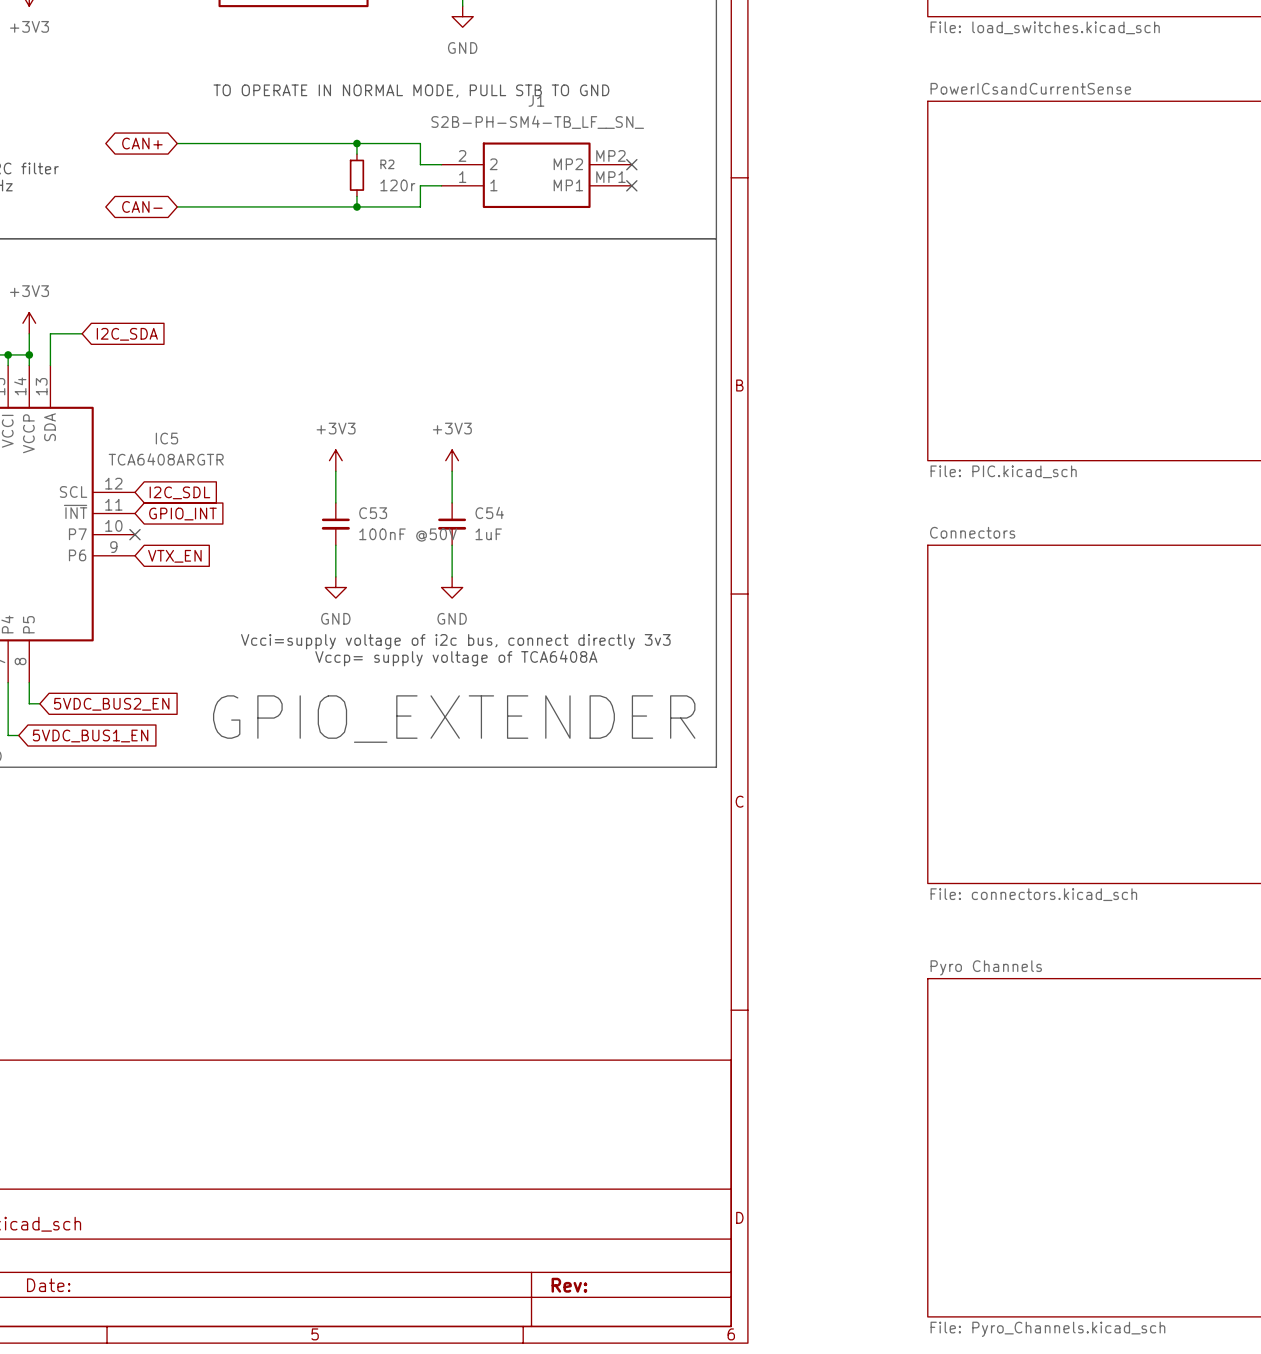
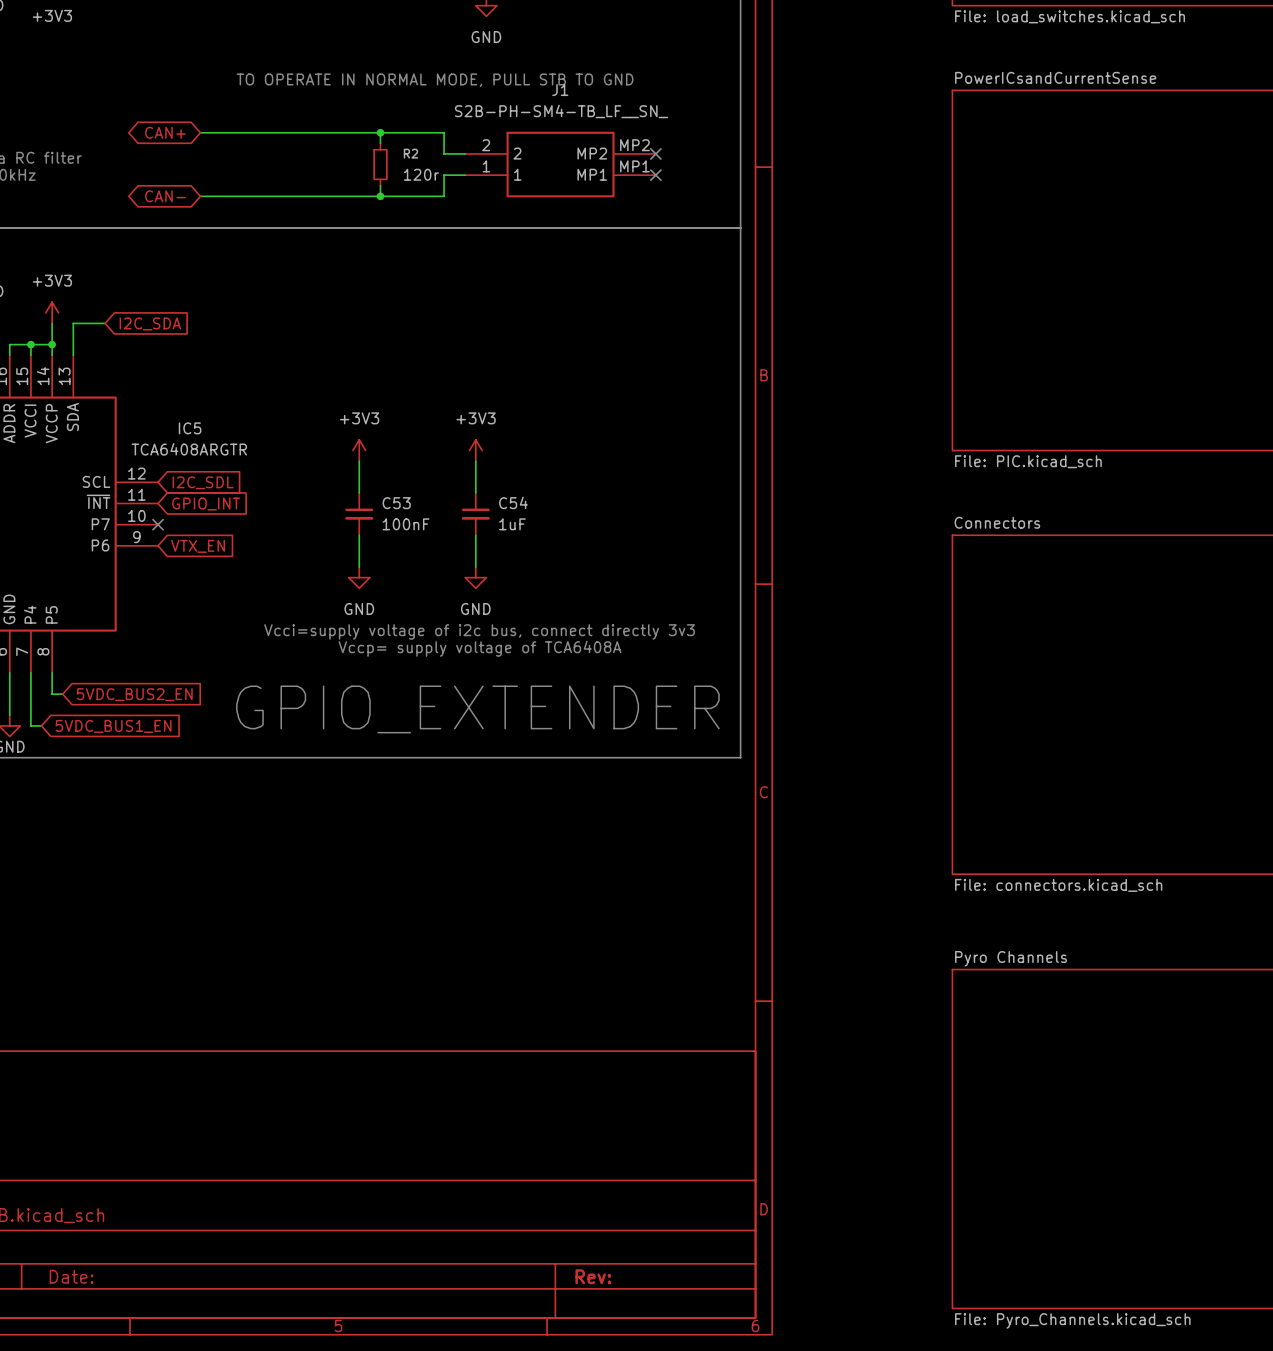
C53 value: 100nF @50V (408, 535) -> 100nF (406, 524)

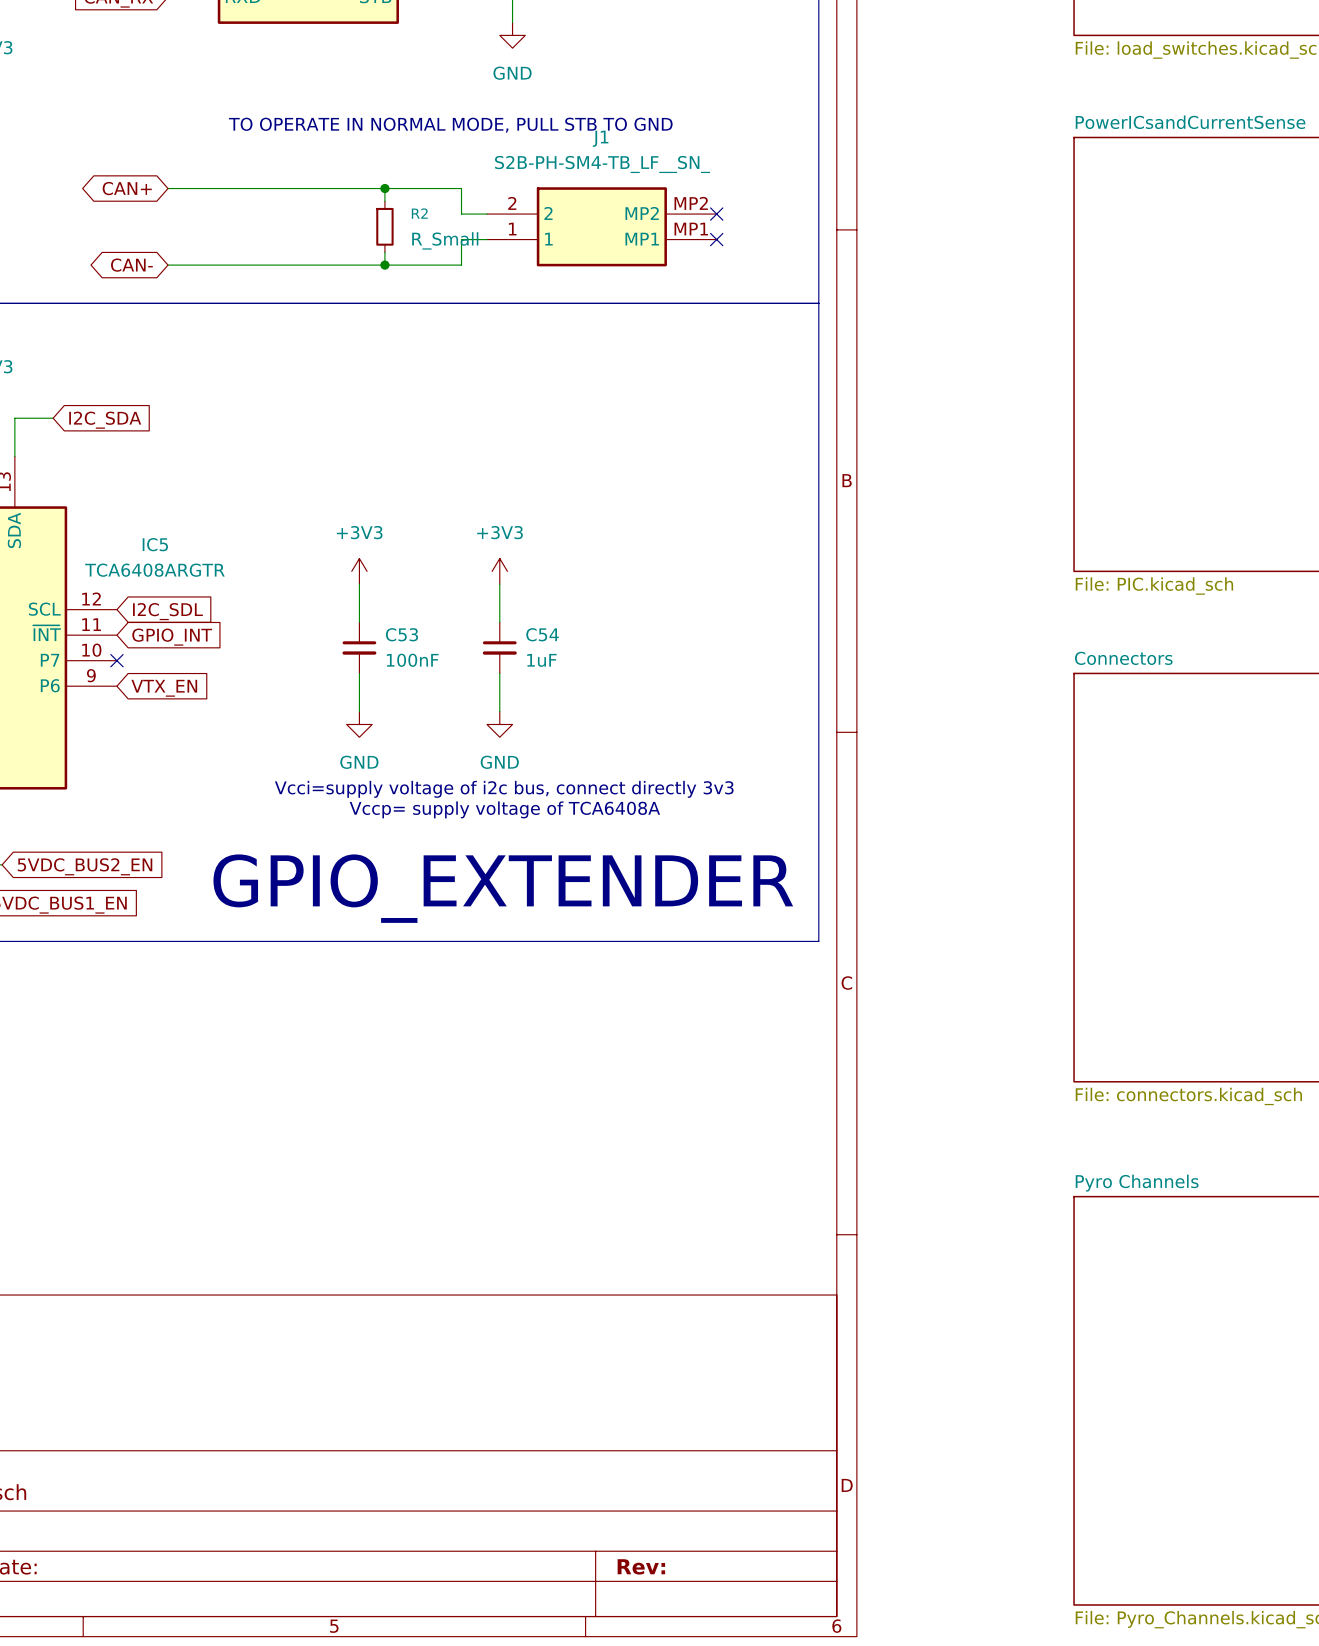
R2 value: 120r (421, 174) -> R_Small (445, 240)

